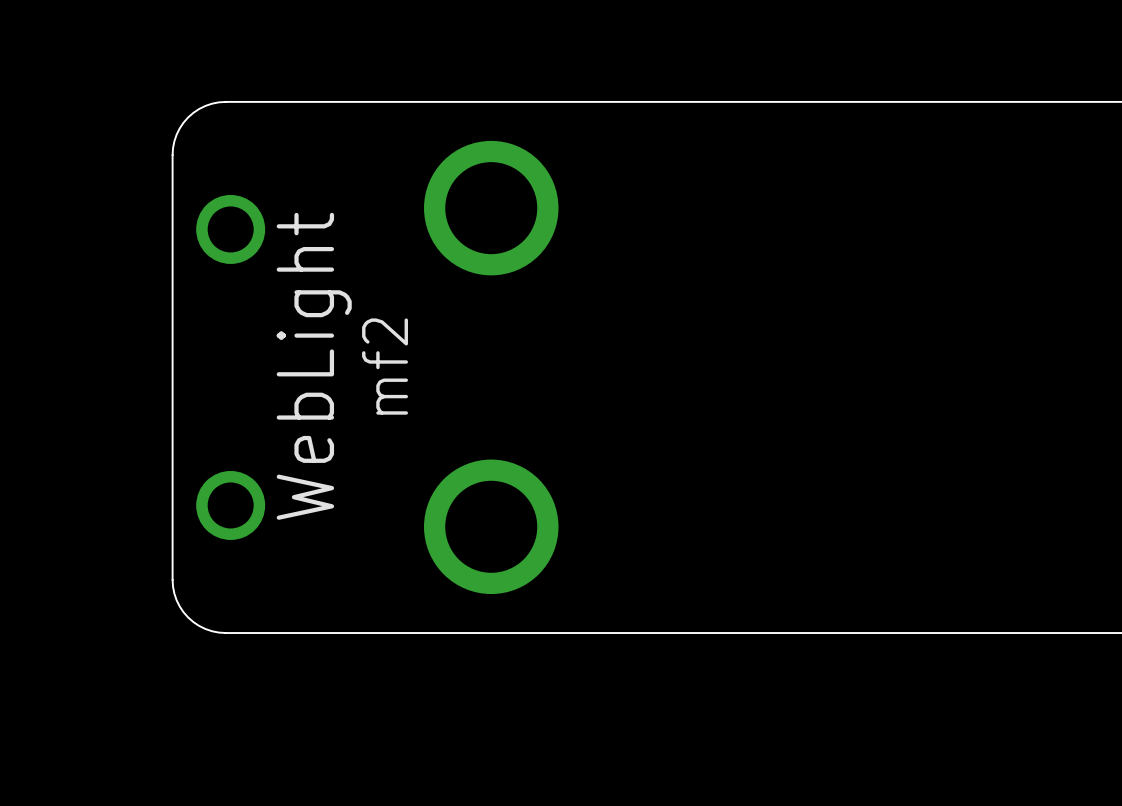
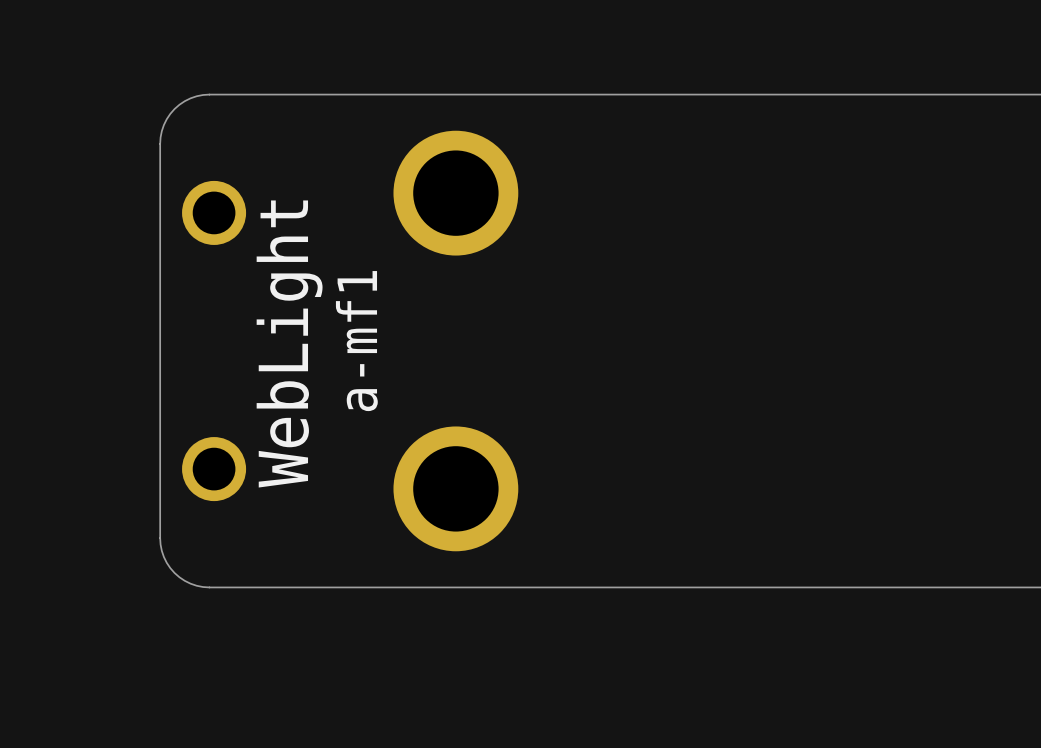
text: mf2 (385, 366) -> a-mf1 (356, 341)

